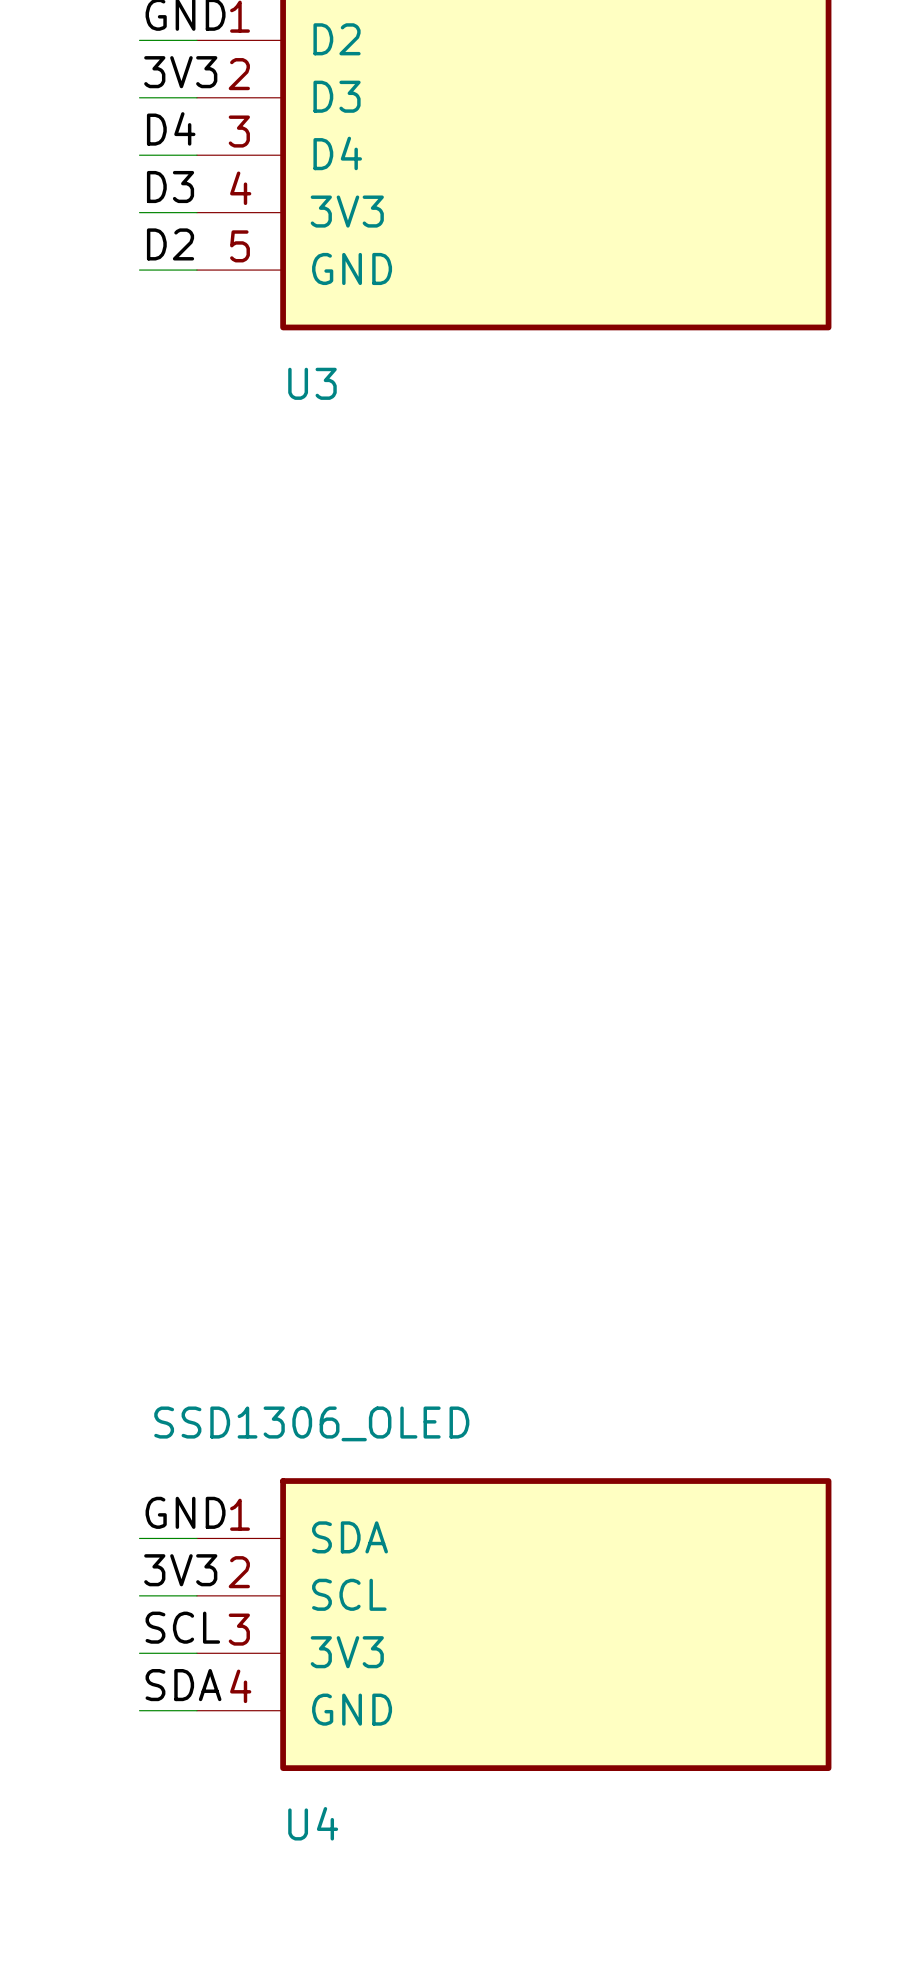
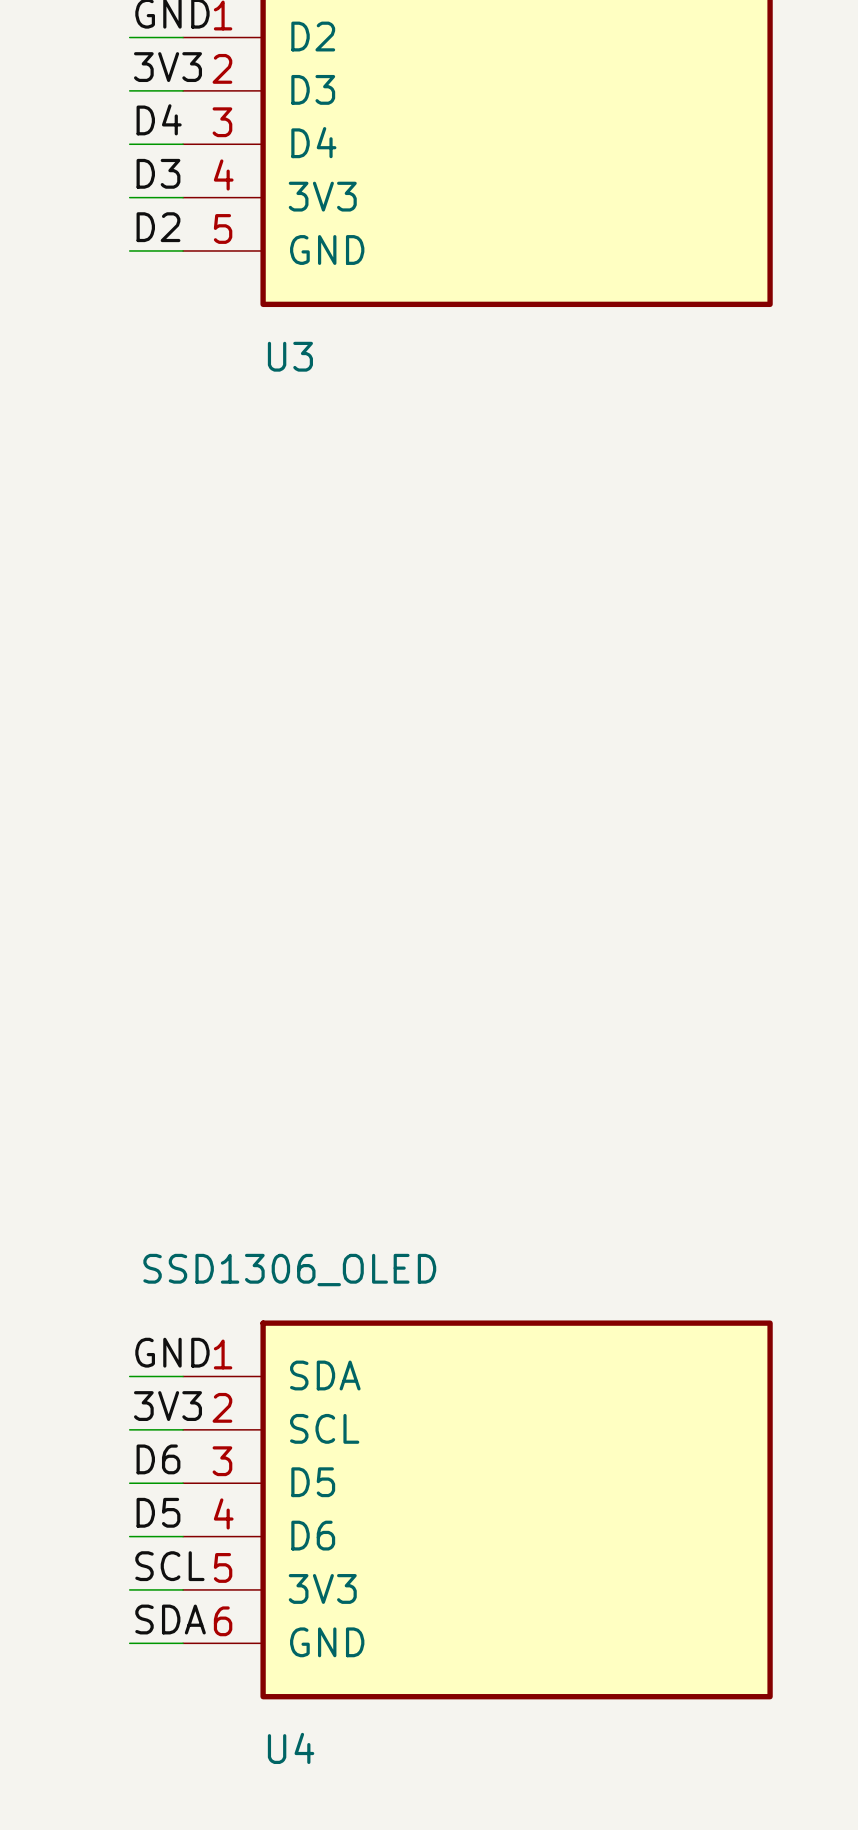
U4 value position: SSD1306_OLED (311, 1423) -> SSD1306_OLED (289, 1270)
label: none -> GND (172, 1352)
U4 symbol: [196, 1478, 832, 1771] -> [183, 1320, 773, 1700]
wire: none -> (129, 1376) (183, 1376)
label: GND (185, 1512) -> 3V3 (168, 1406)
label: 3V3 (180, 1570) -> D6 (158, 1459)
label: SCL (182, 1627) -> D5 (158, 1512)
label: SDA (183, 1685) -> SCL (169, 1566)
label: none -> SDA (170, 1619)
wire: none -> (129, 1643) (183, 1643)
U4 name position: U4 (313, 1823) -> U4 (291, 1748)

